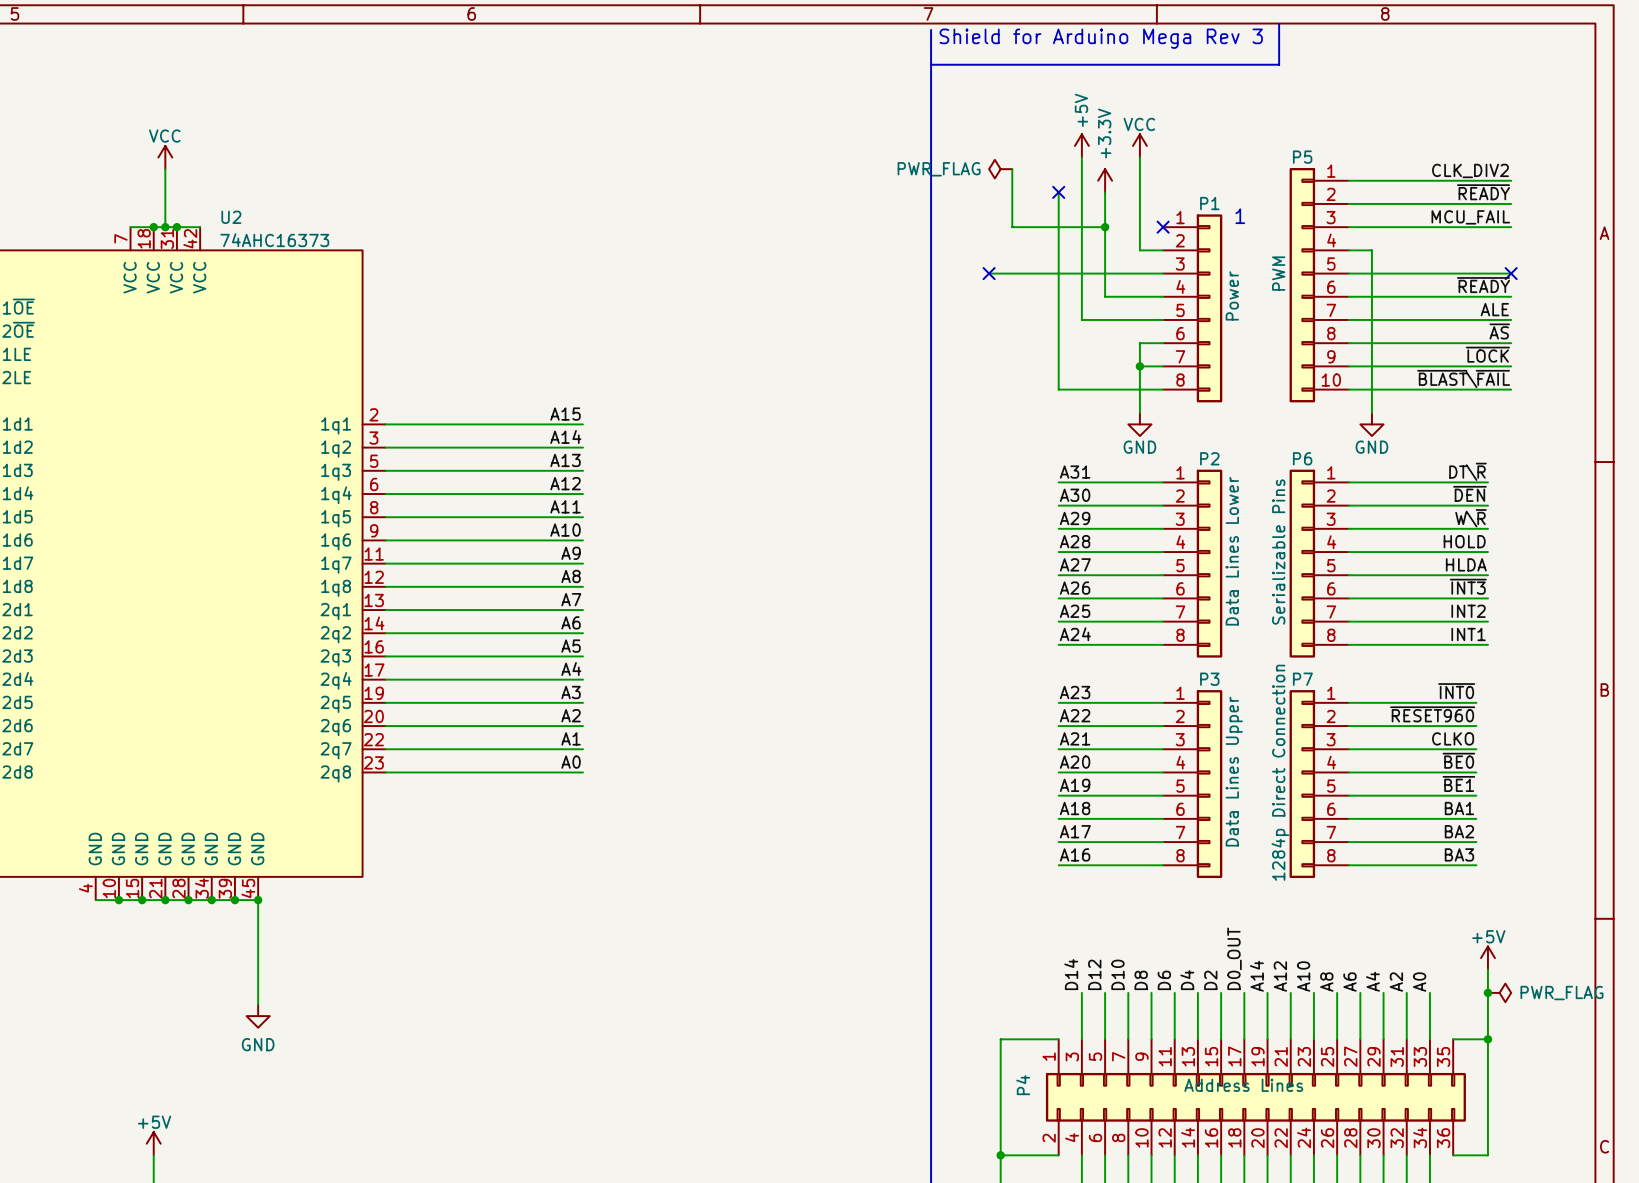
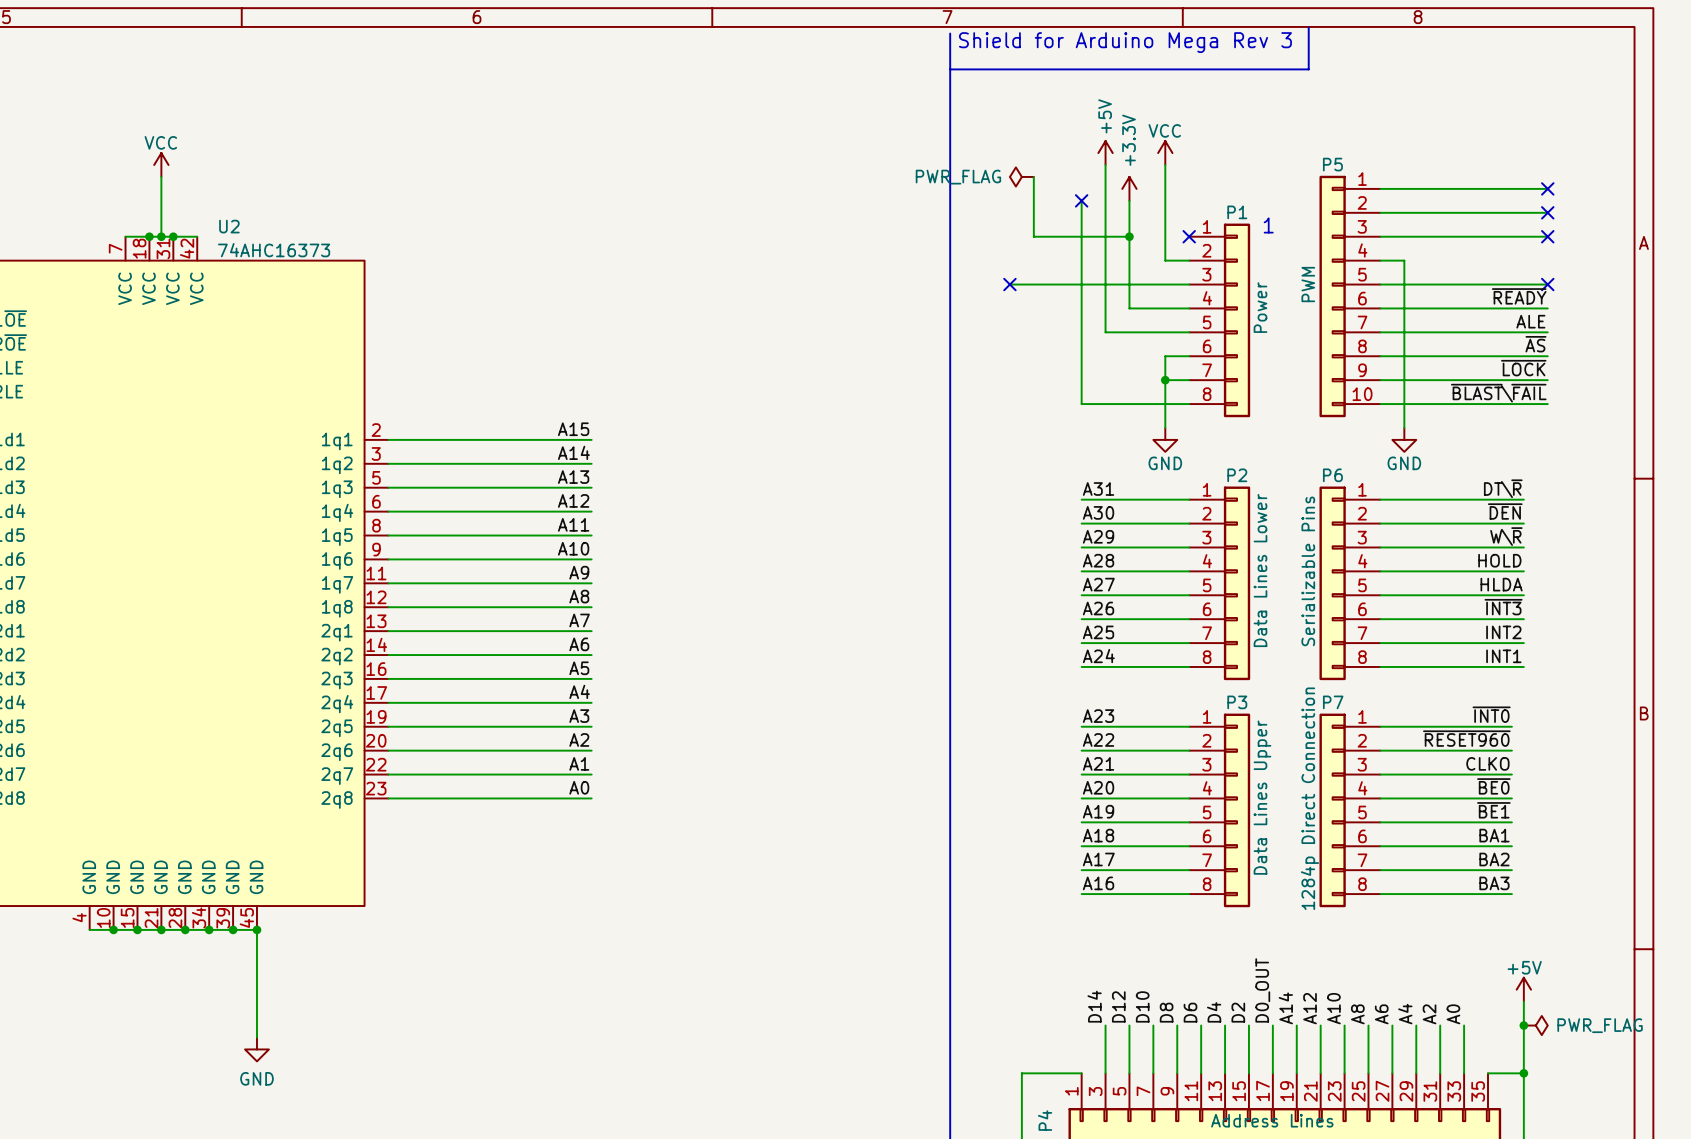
label: CLK_DIV2 (1470, 170) -> none
no-connect mark: none -> (1547, 188)
label: ~{READY} (1483, 192) -> none
no-connect mark: none -> (1547, 212)
label: MCU_FAIL (1470, 217) -> none
no-connect mark: none -> (1547, 236)

